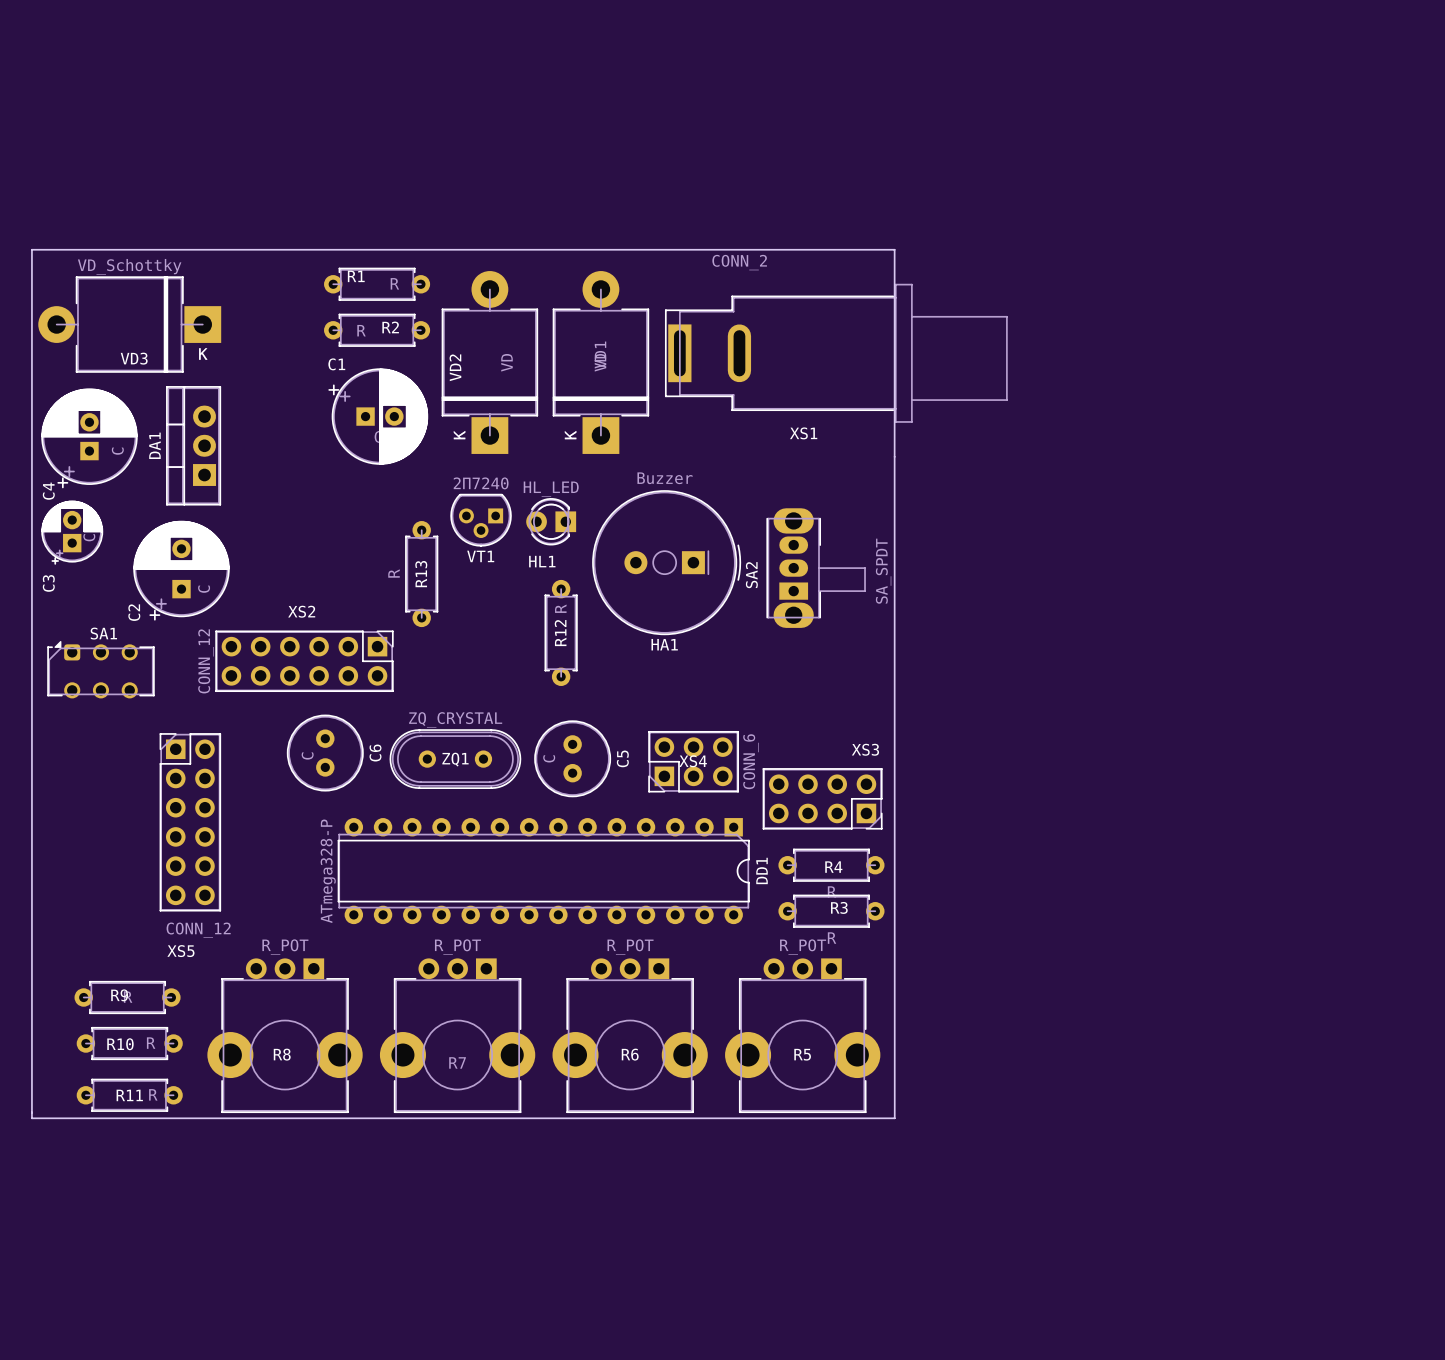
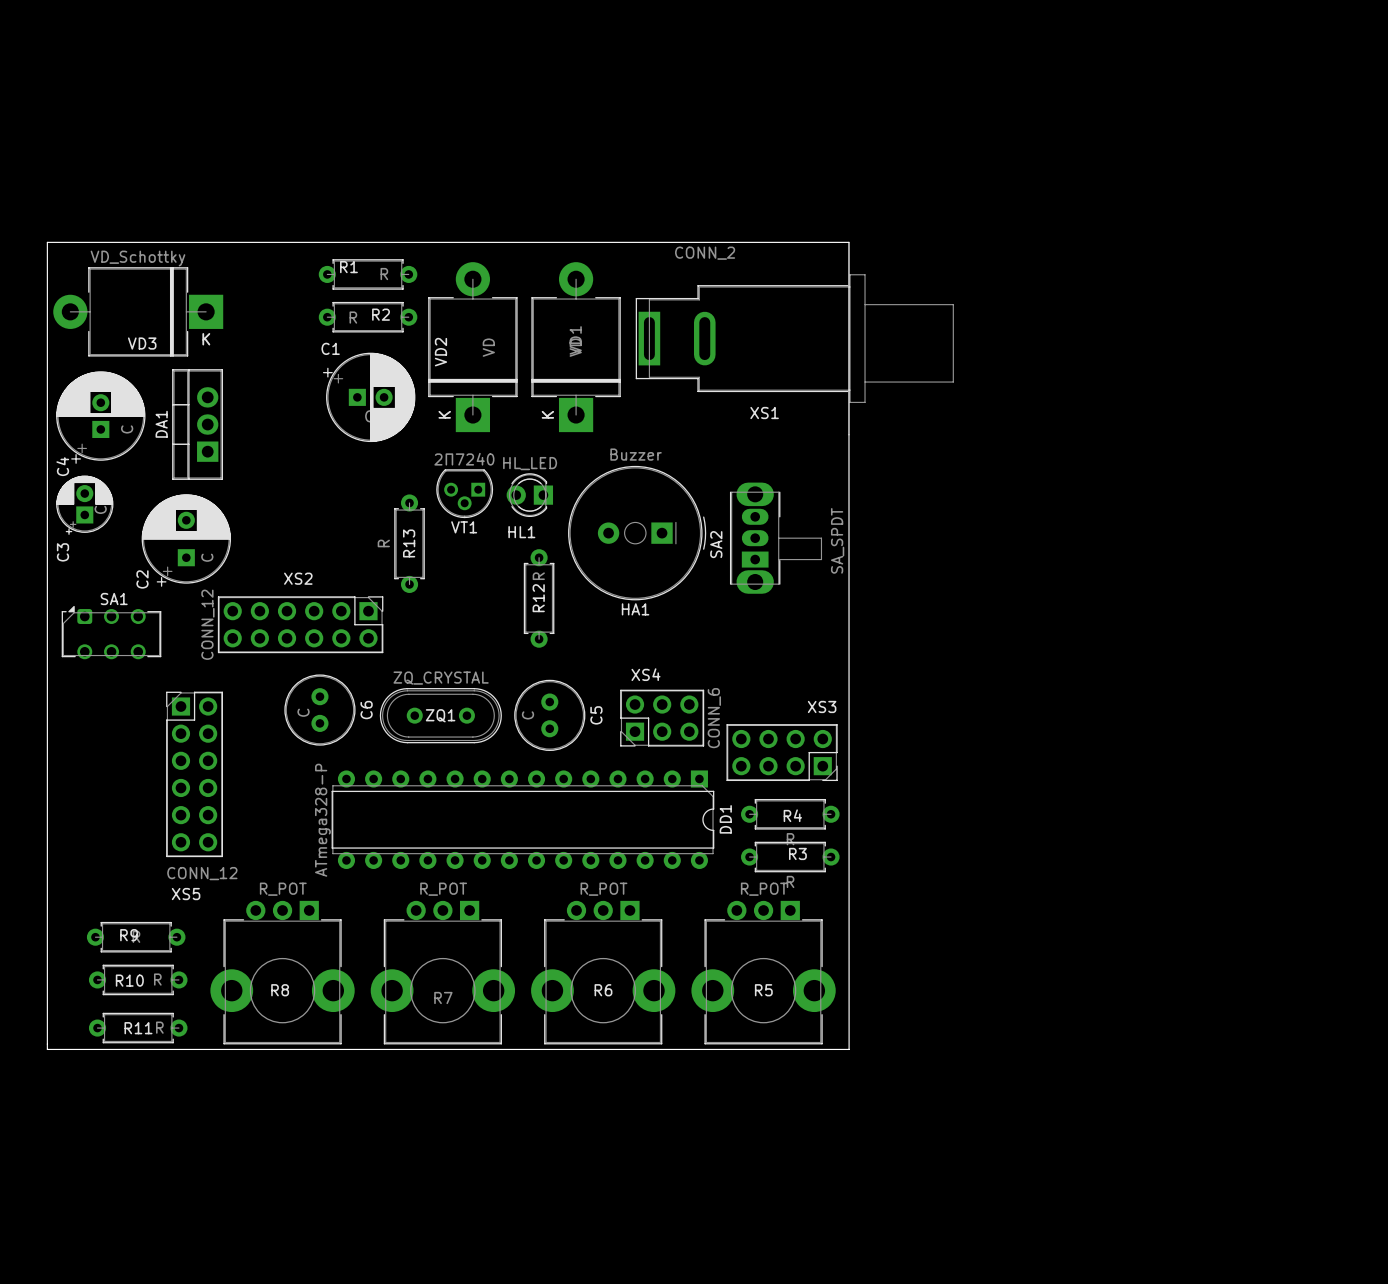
XS4 name position: XS4 (693, 761) -> XS4 (645, 674)

